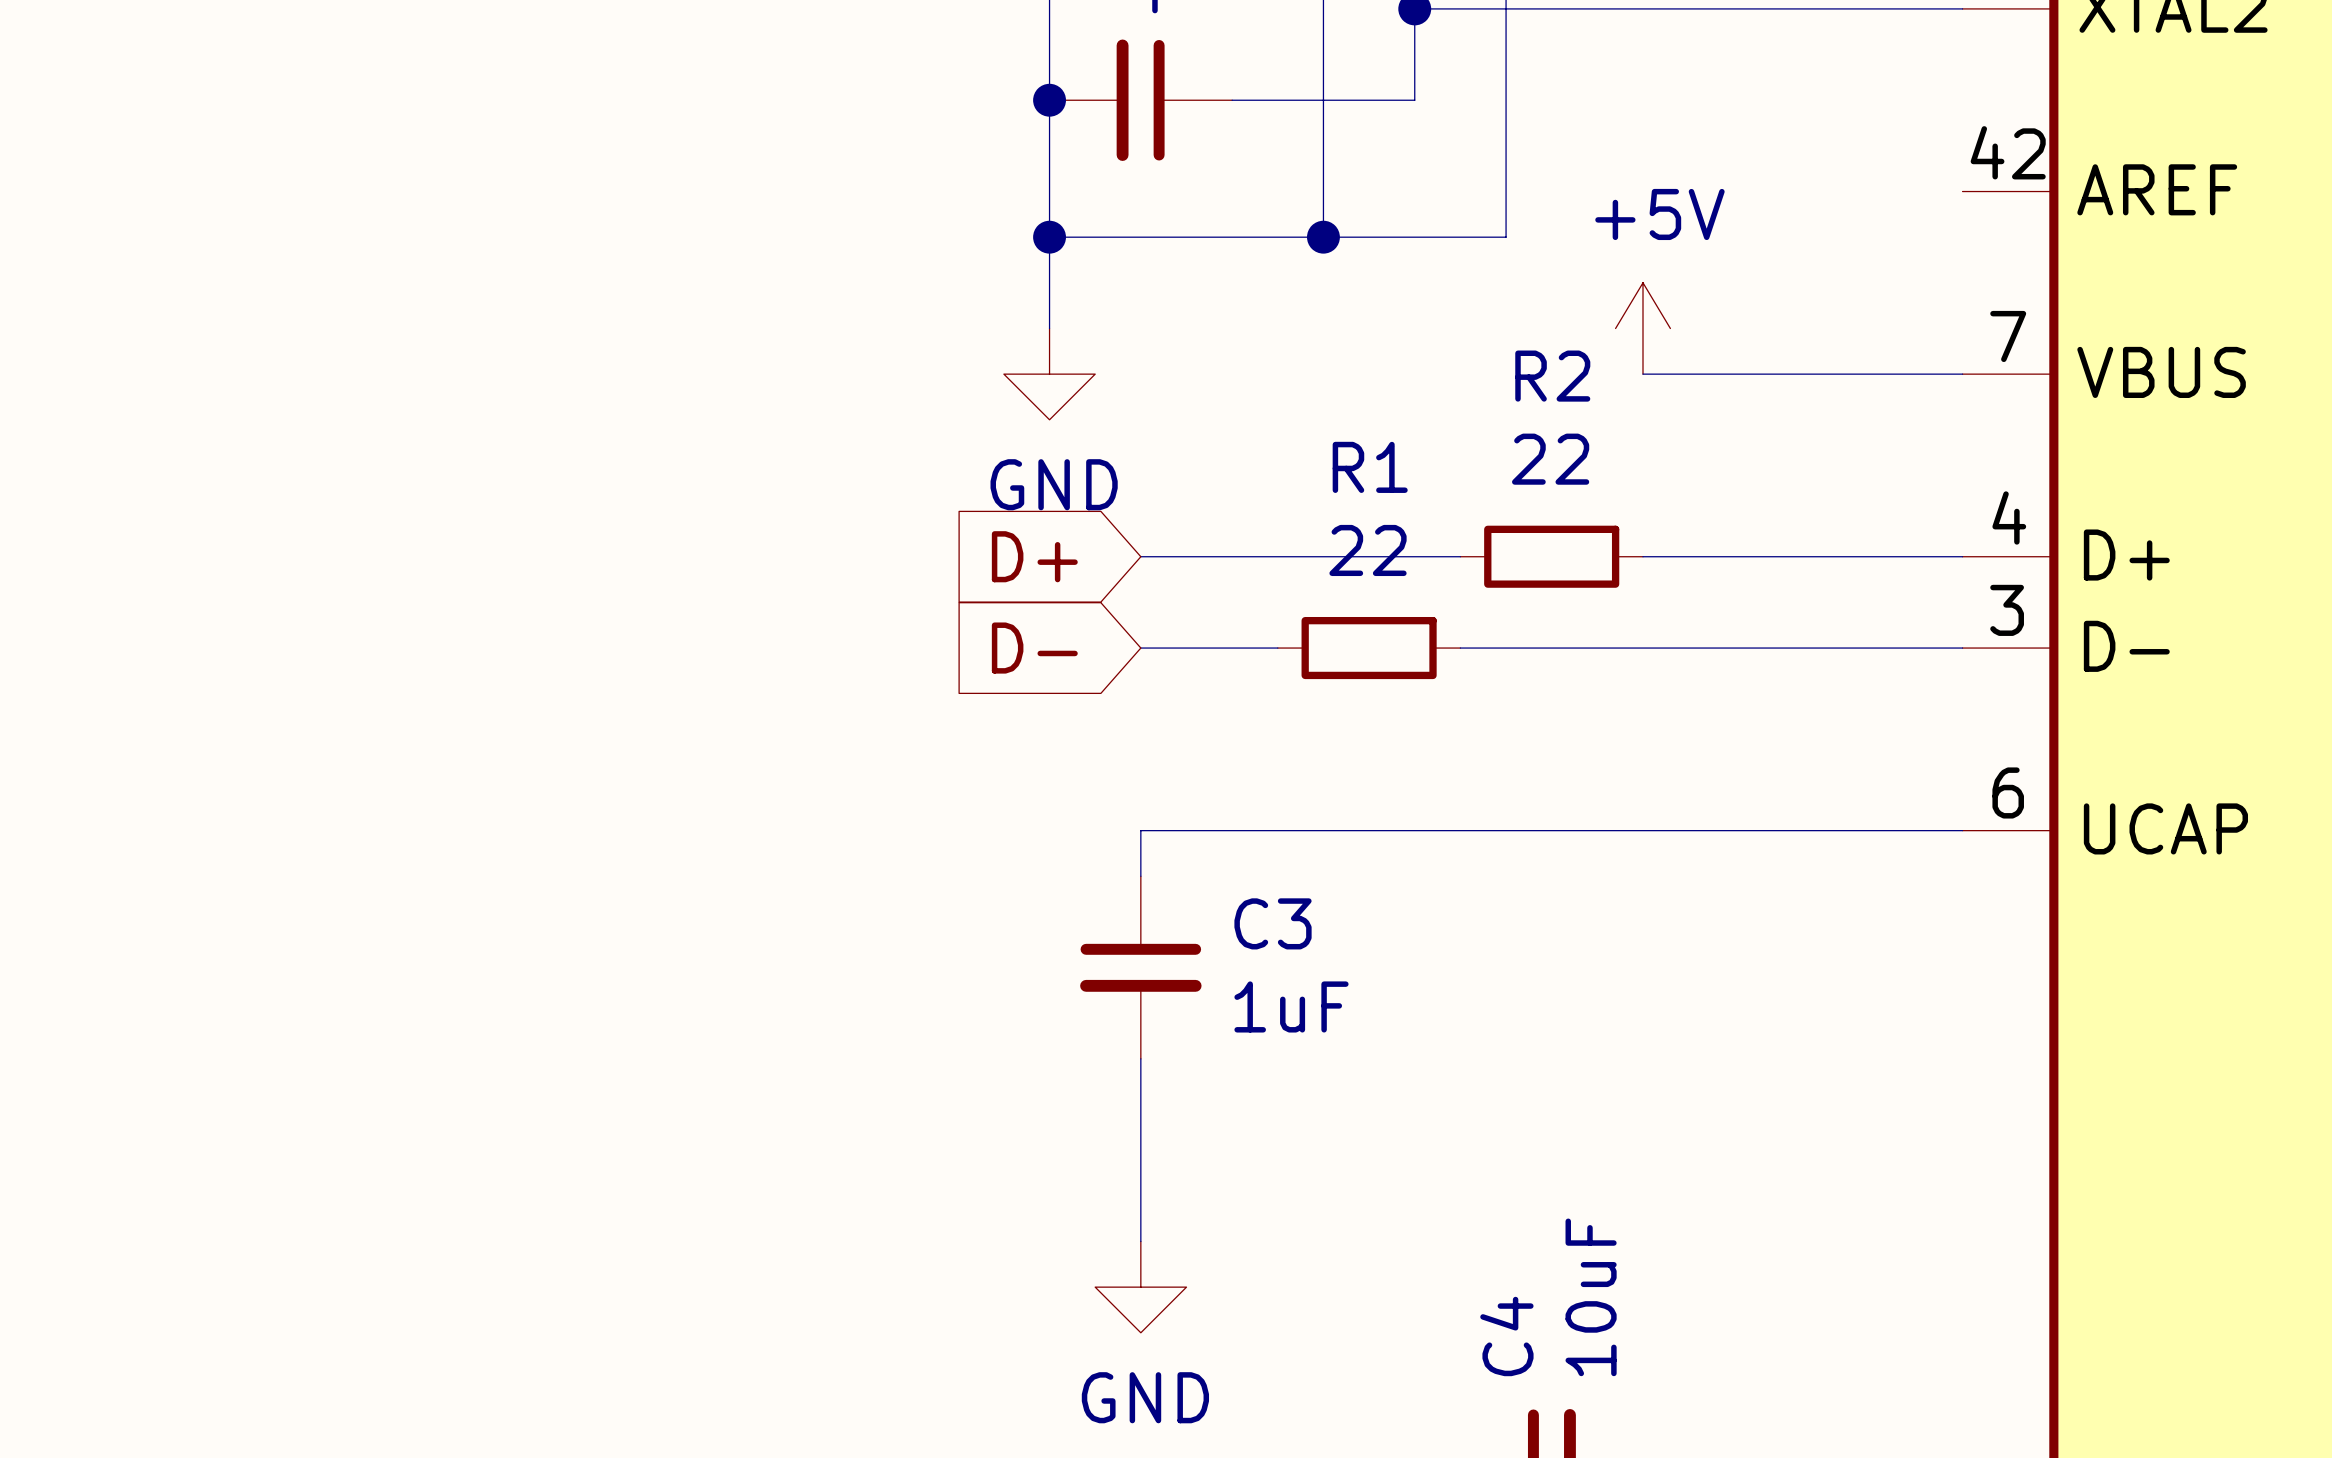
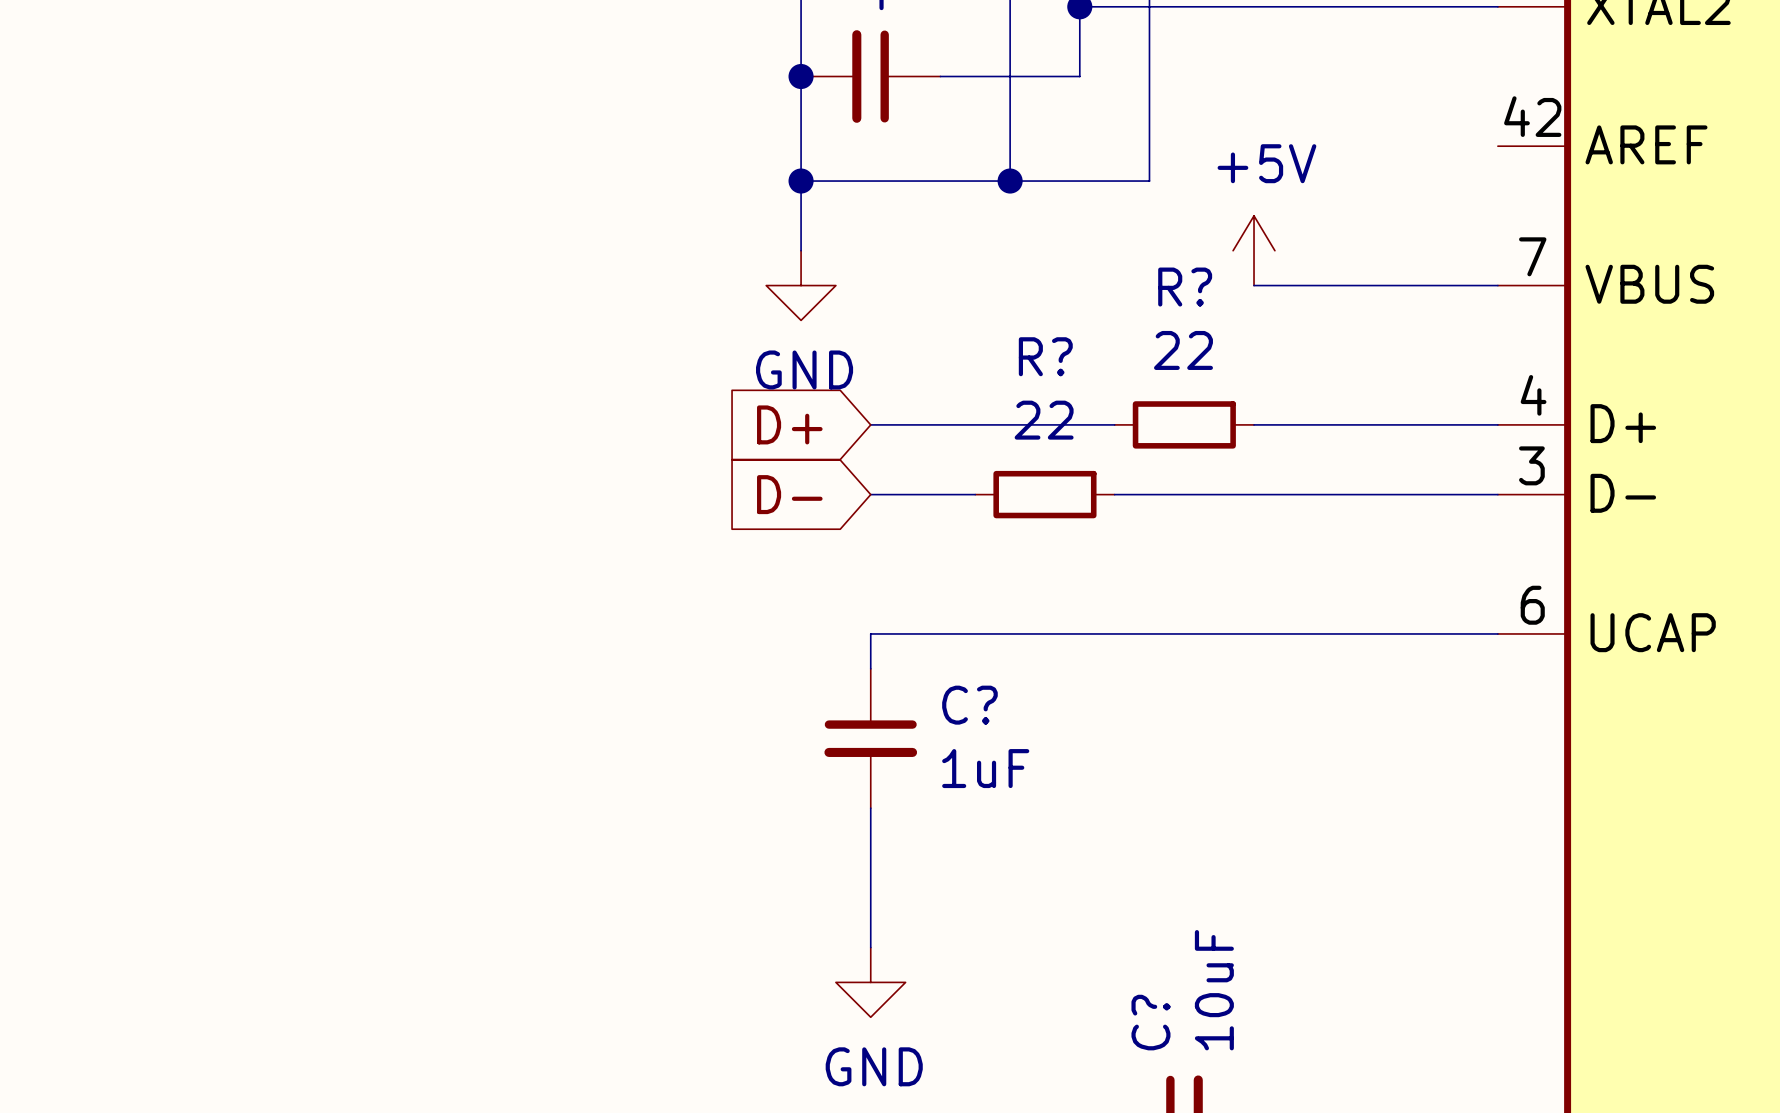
R2 name: R2 (1552, 376) -> R? (1185, 287)
R1 name: R1 (1370, 467) -> R? (1045, 356)
C3 name: C3 (1273, 923) -> C? (969, 705)
C4 name: C4 (1506, 1336) -> C? (1150, 1022)

